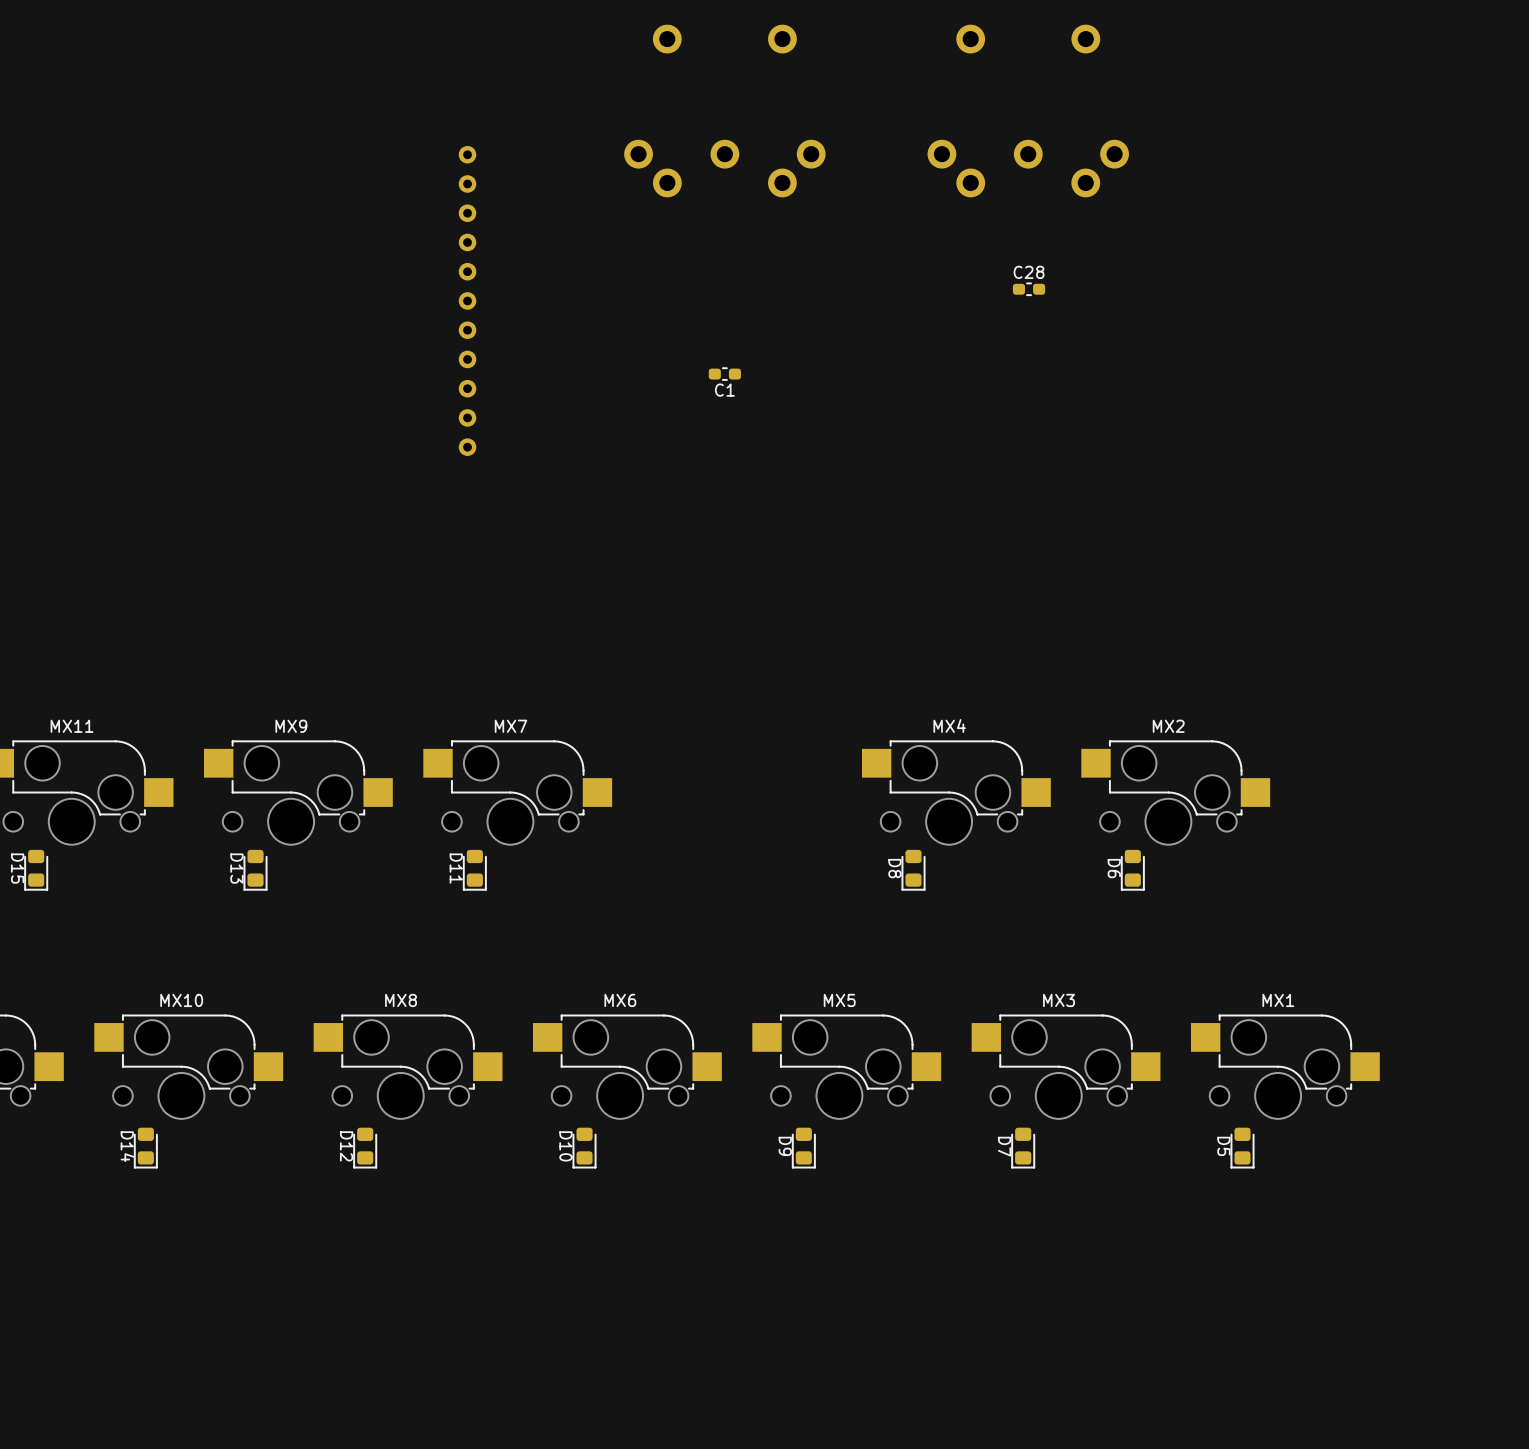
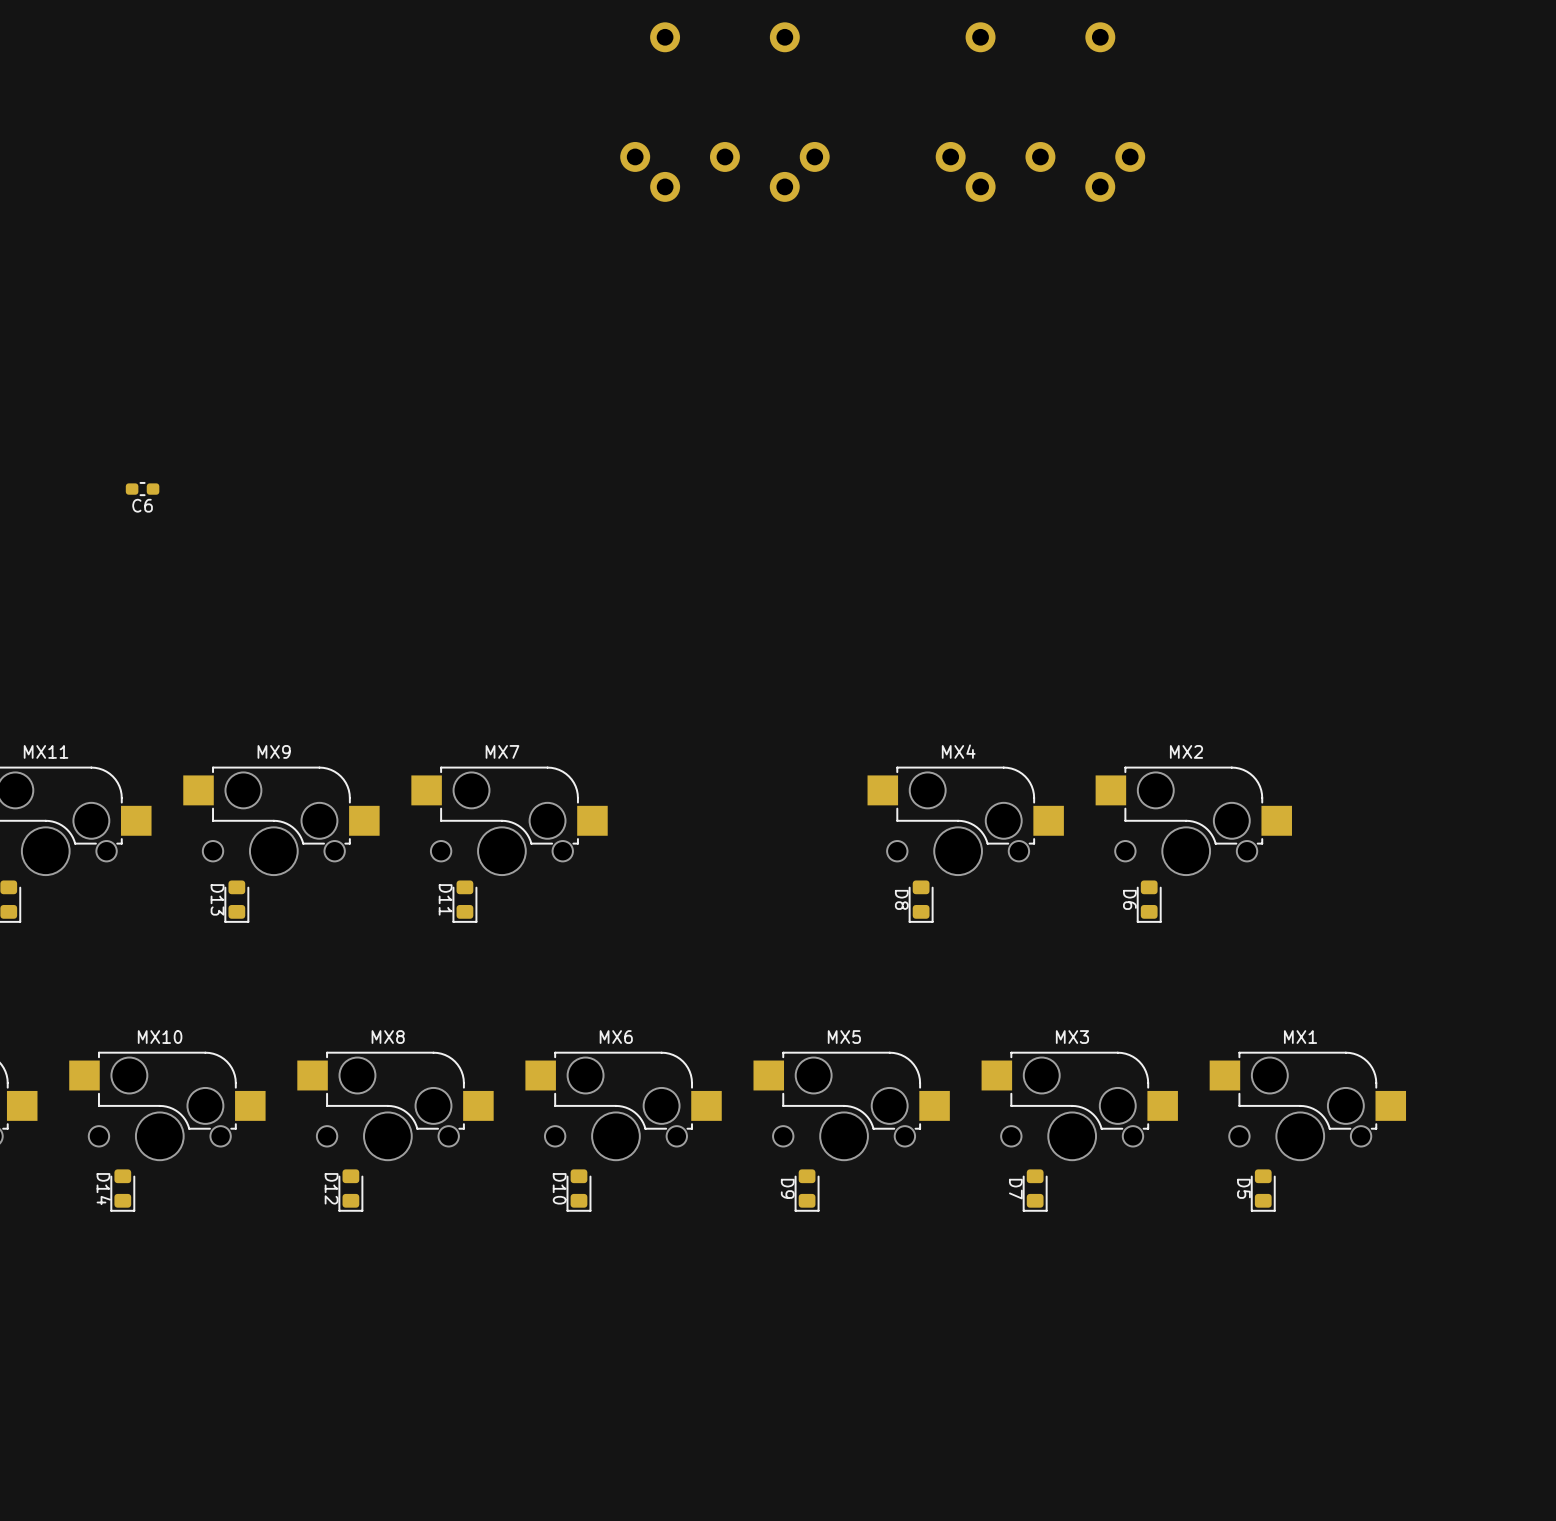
C28: (1029, 289) -> none
part: (467, 300) -> none
C1: (724, 374) -> none
C6: none -> (142, 489)

